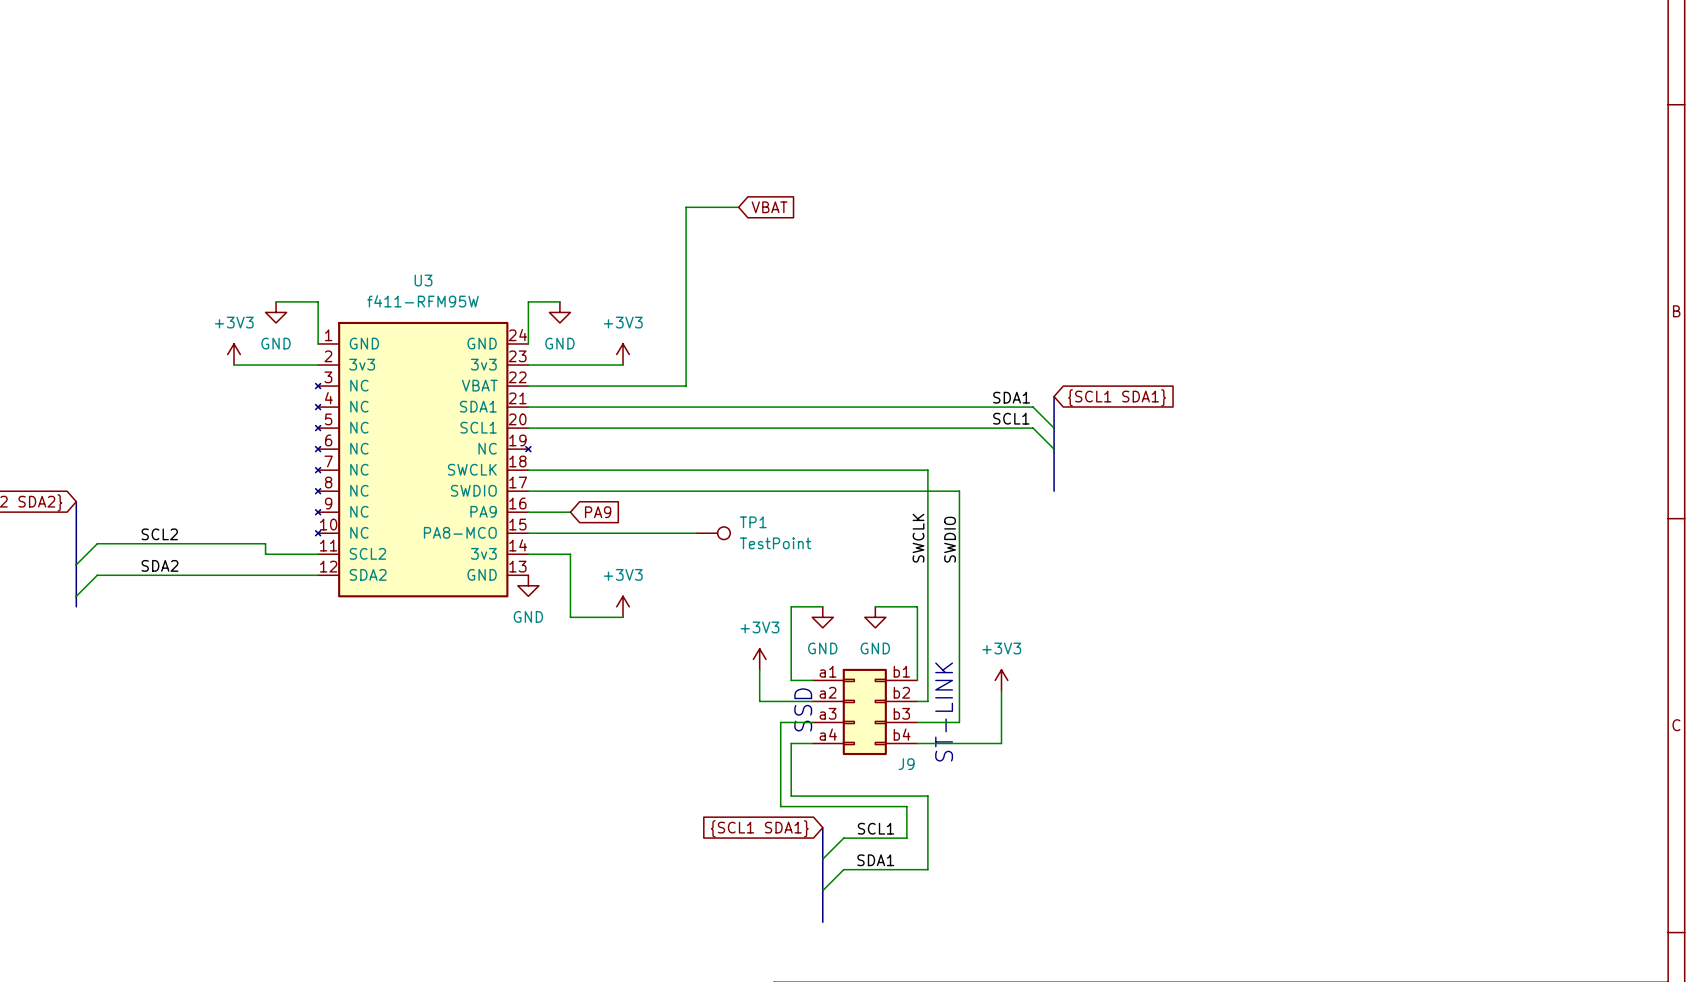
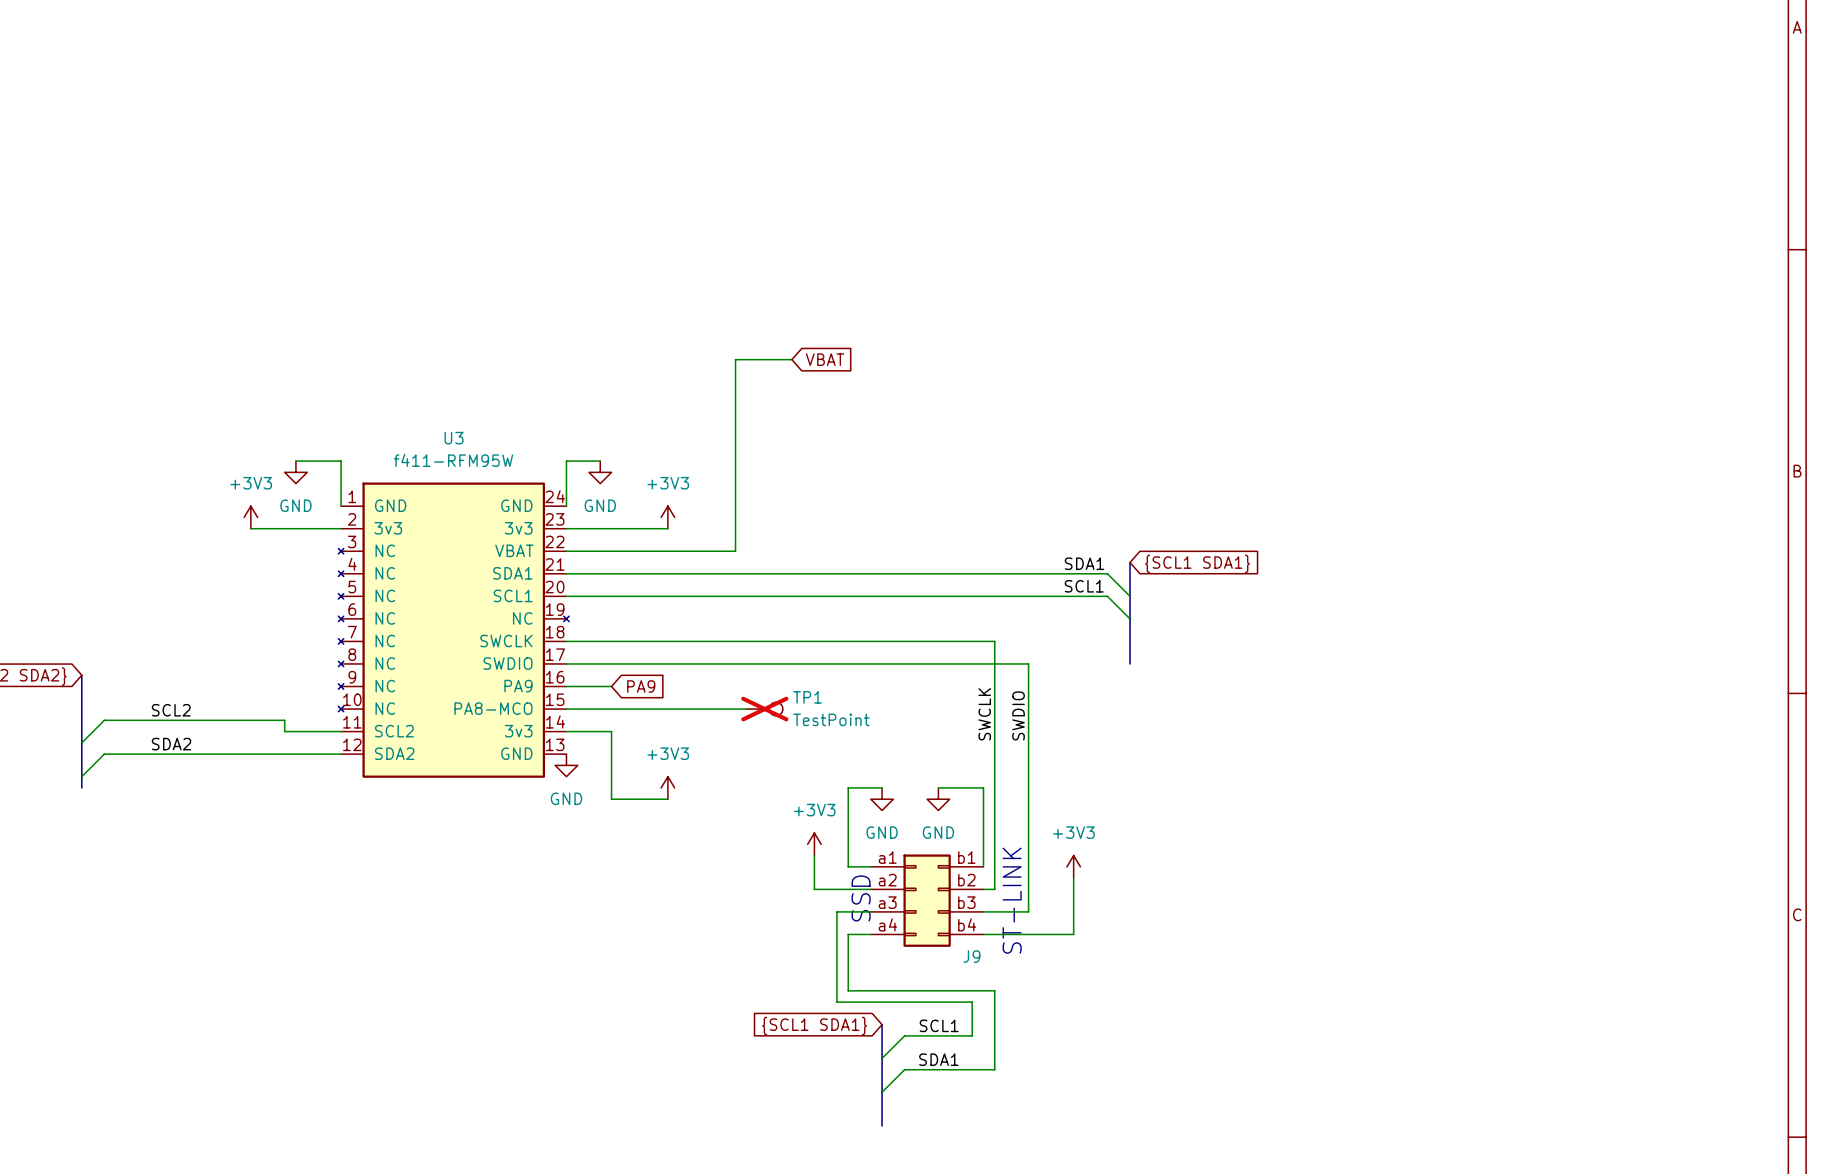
TP1 do-not-place cross: none -> (764, 709)

